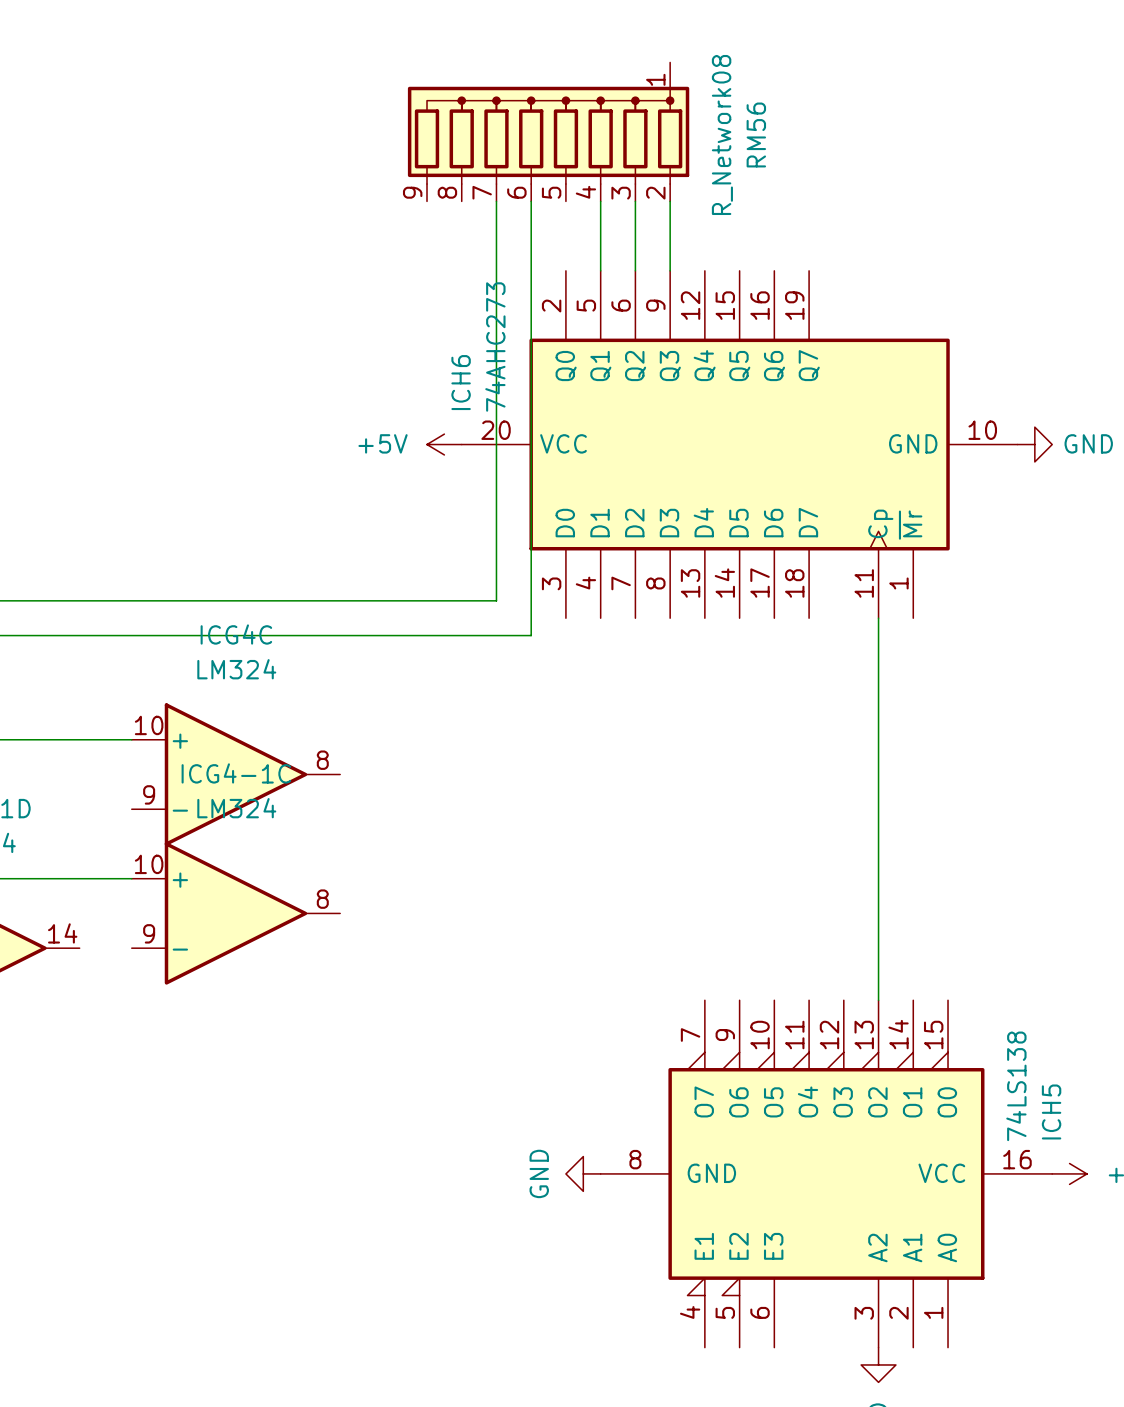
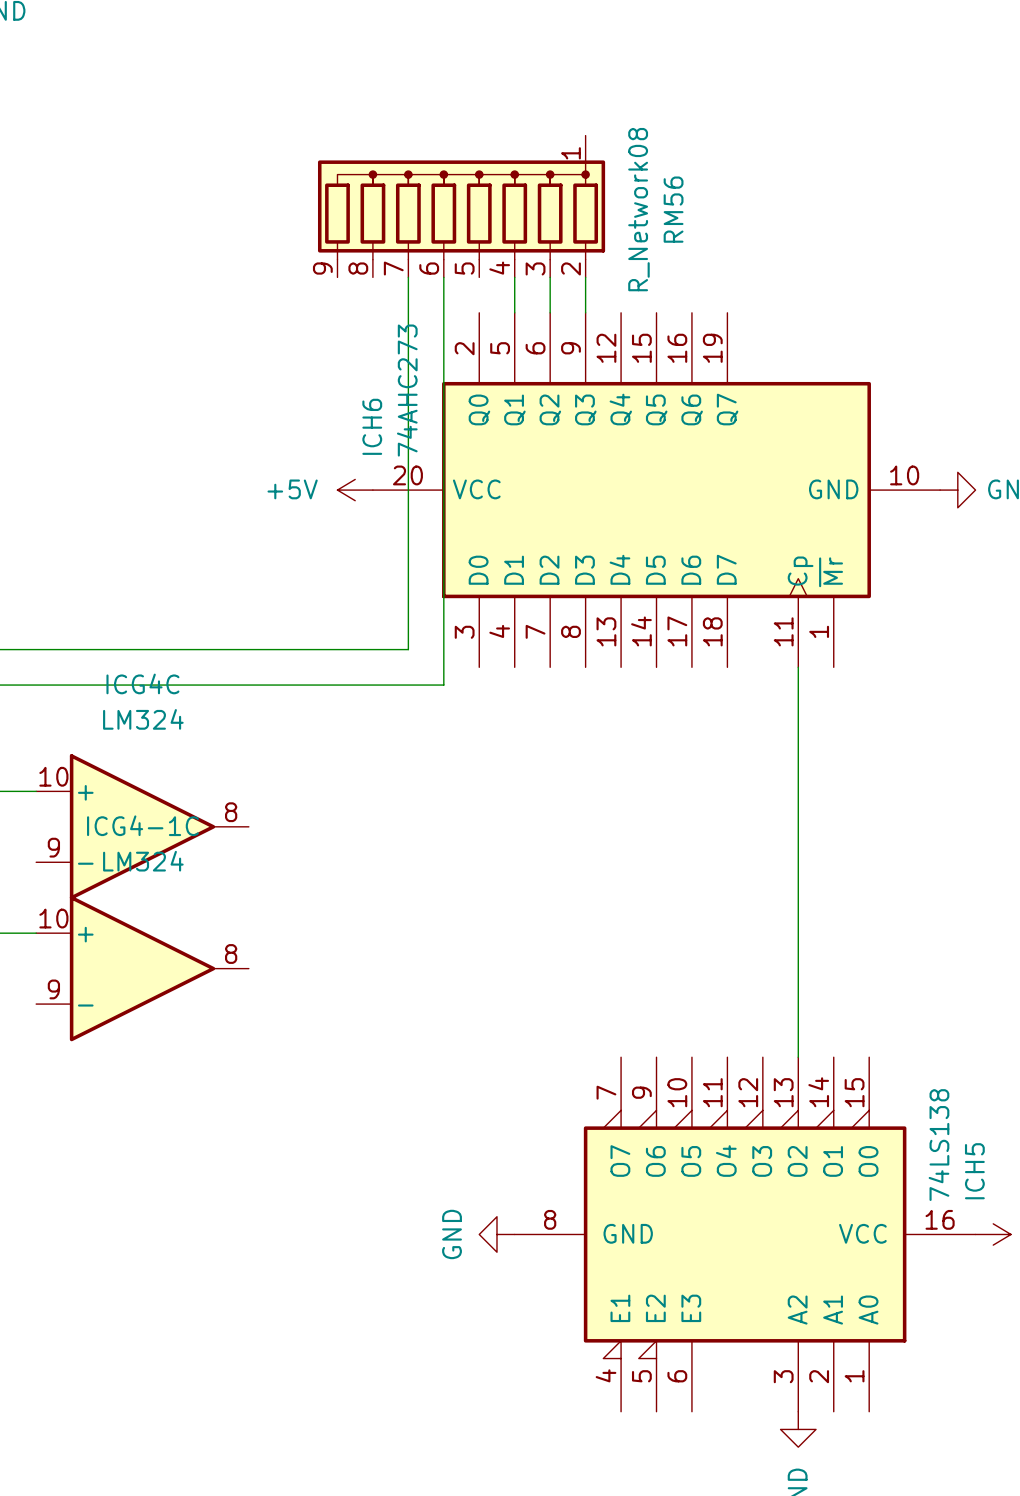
RM56 position: (548, 131) -> (461, 206)

